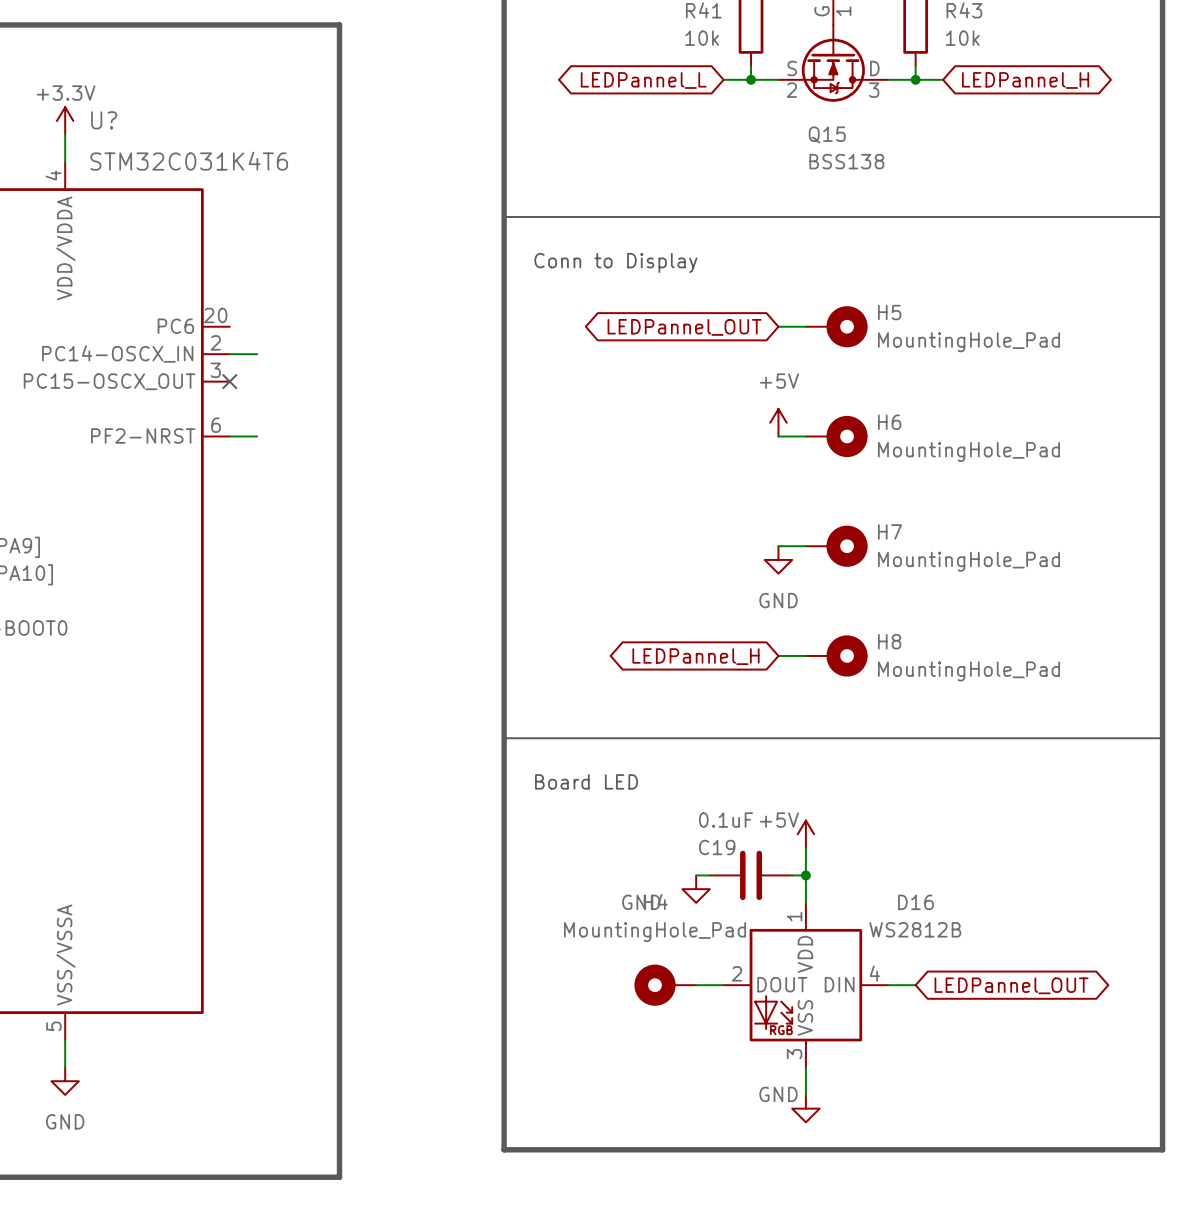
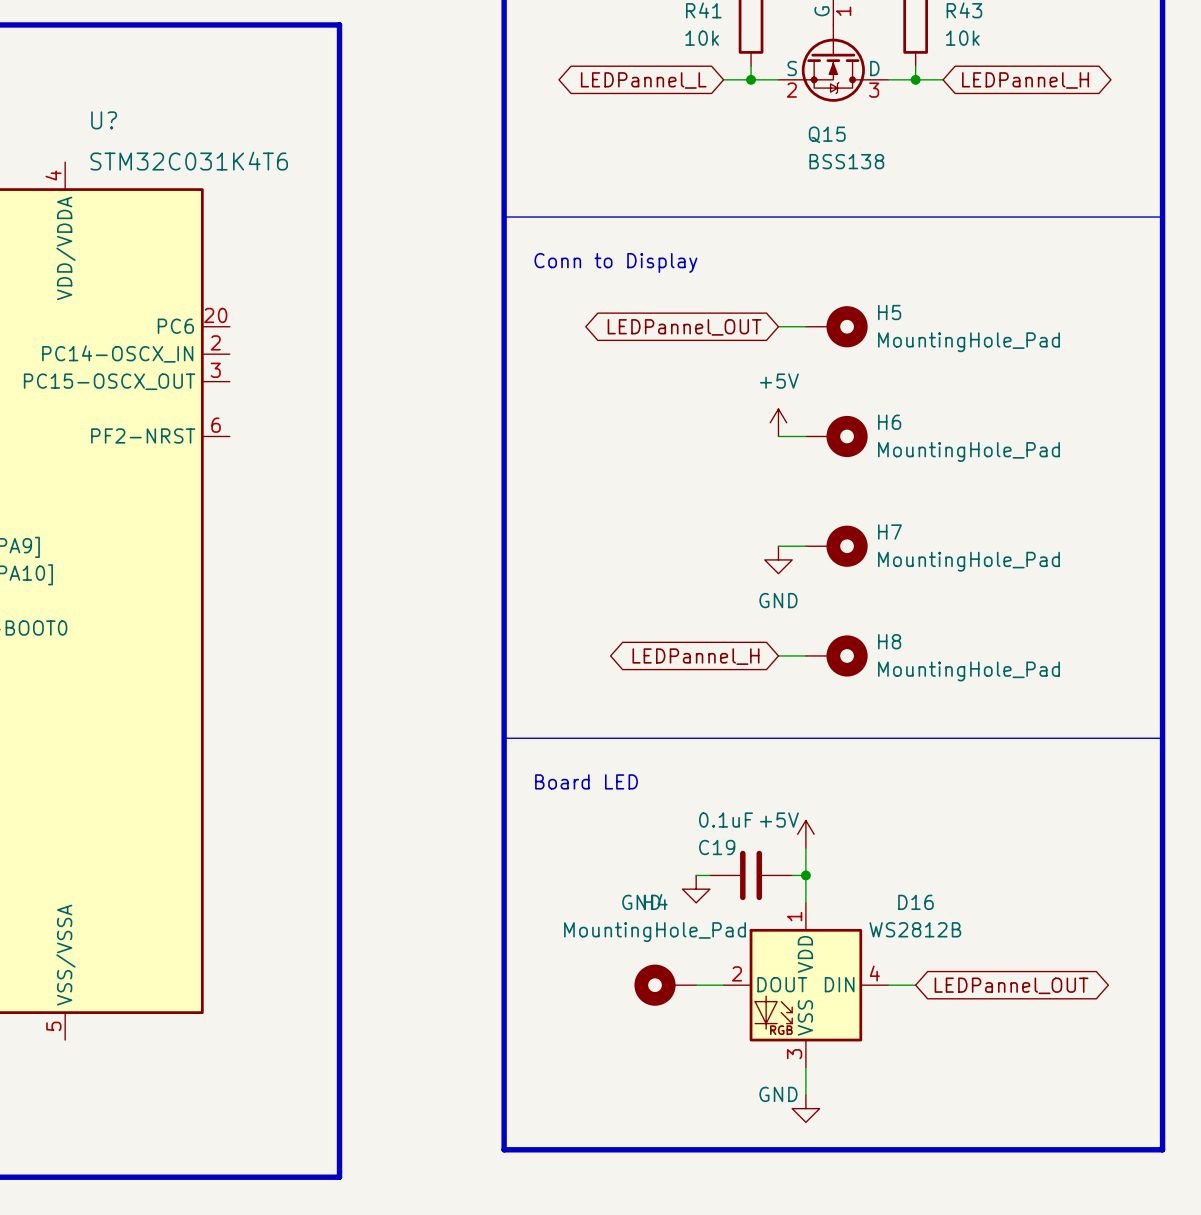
power symbol: +3.3V (65, 120) -> none
wire: (65, 134) (65, 162) -> none
wire: (229, 354) (257, 354) -> none
no-connect mark: (229, 381) -> none
wire: (229, 436) (257, 436) -> none
wire: (65, 1040) (65, 1067) -> none
power symbol: GND (65, 1081) -> none

